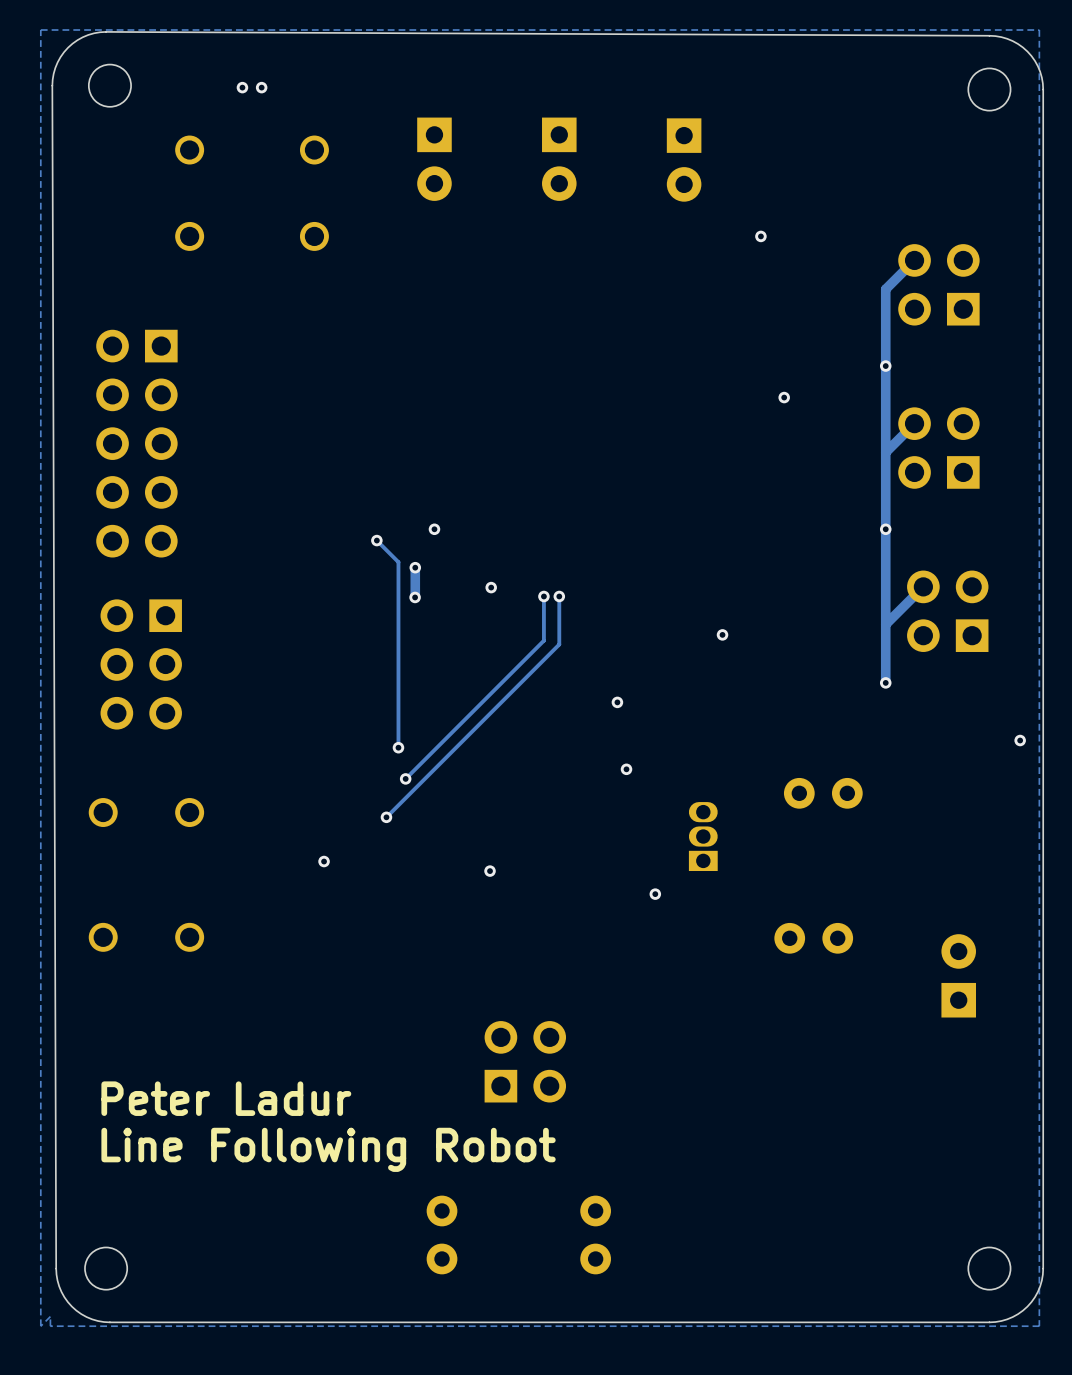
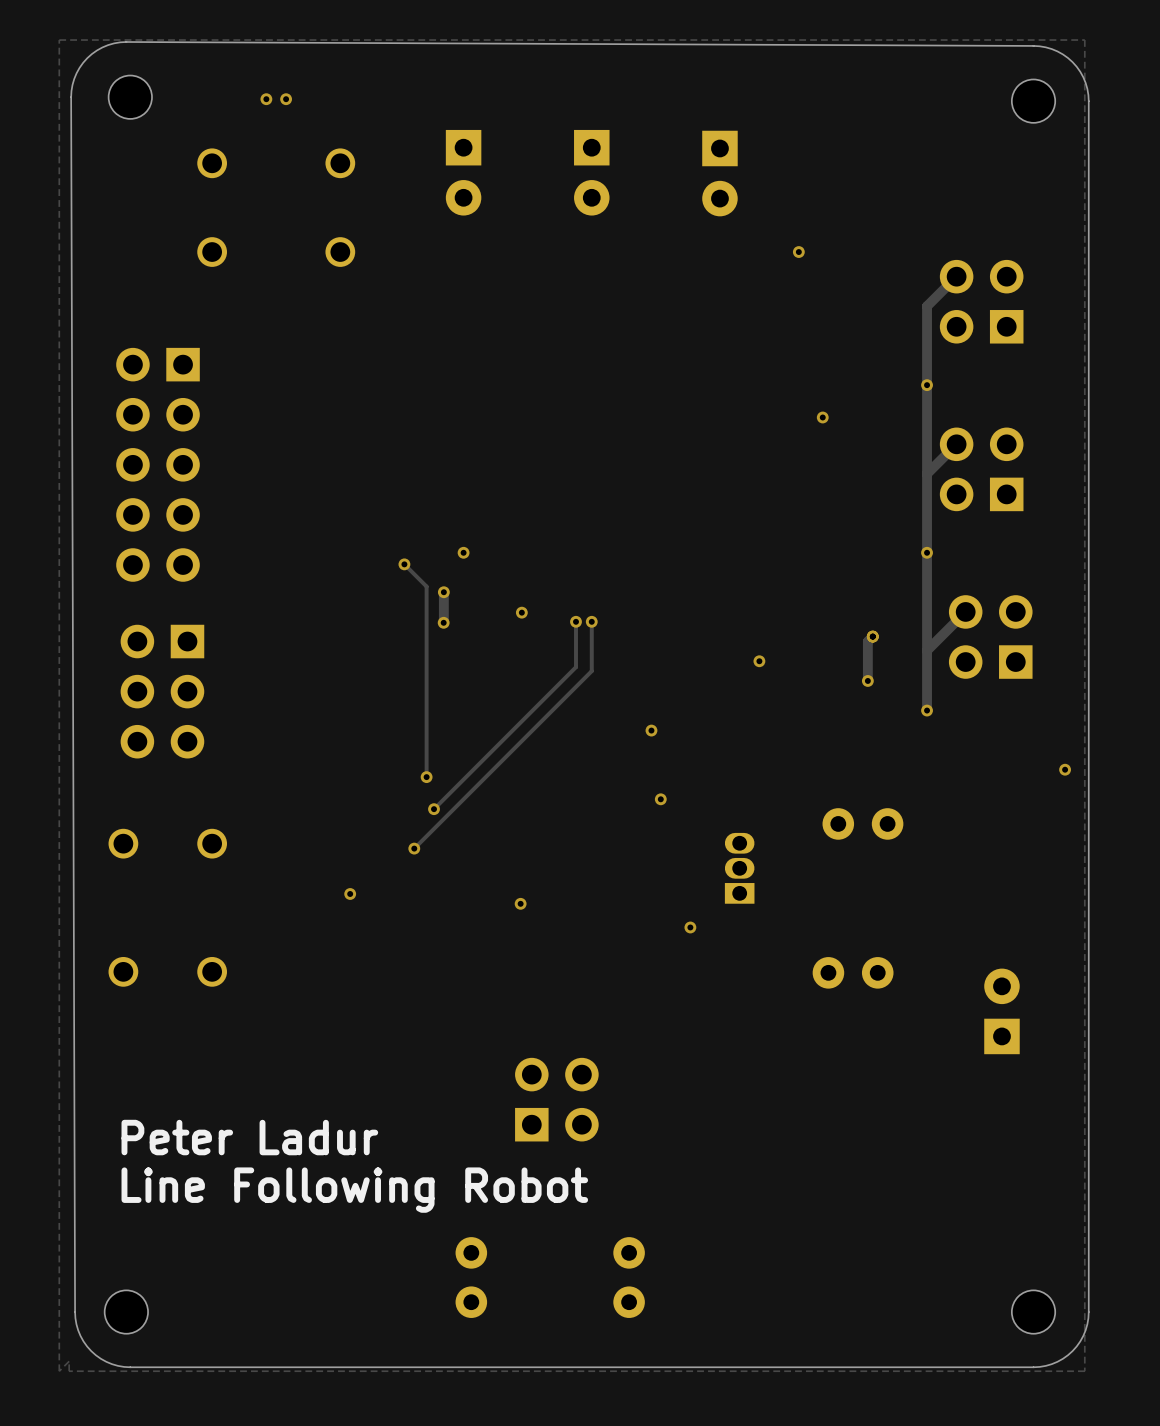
track: none -> (872, 636) (867, 641) (867, 680)
via: none -> (872, 636)
via: none -> (867, 680)

